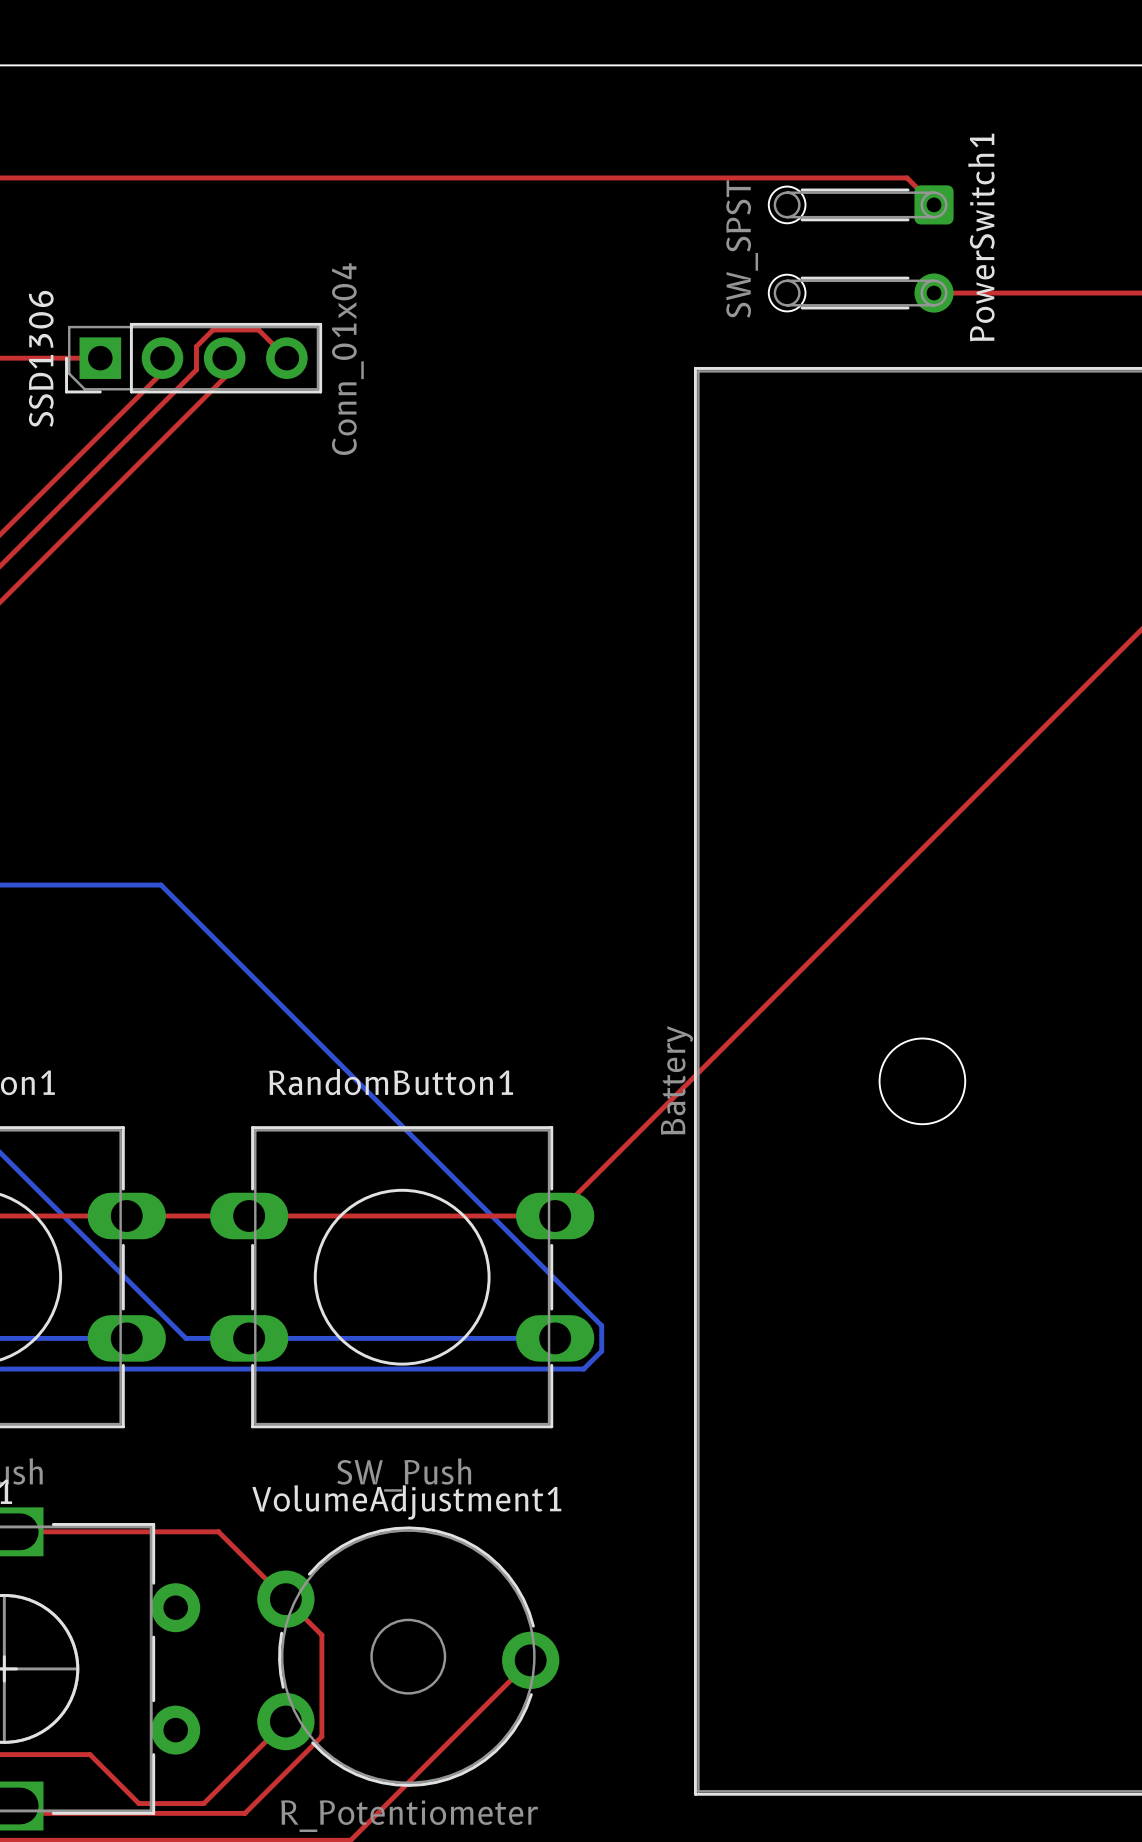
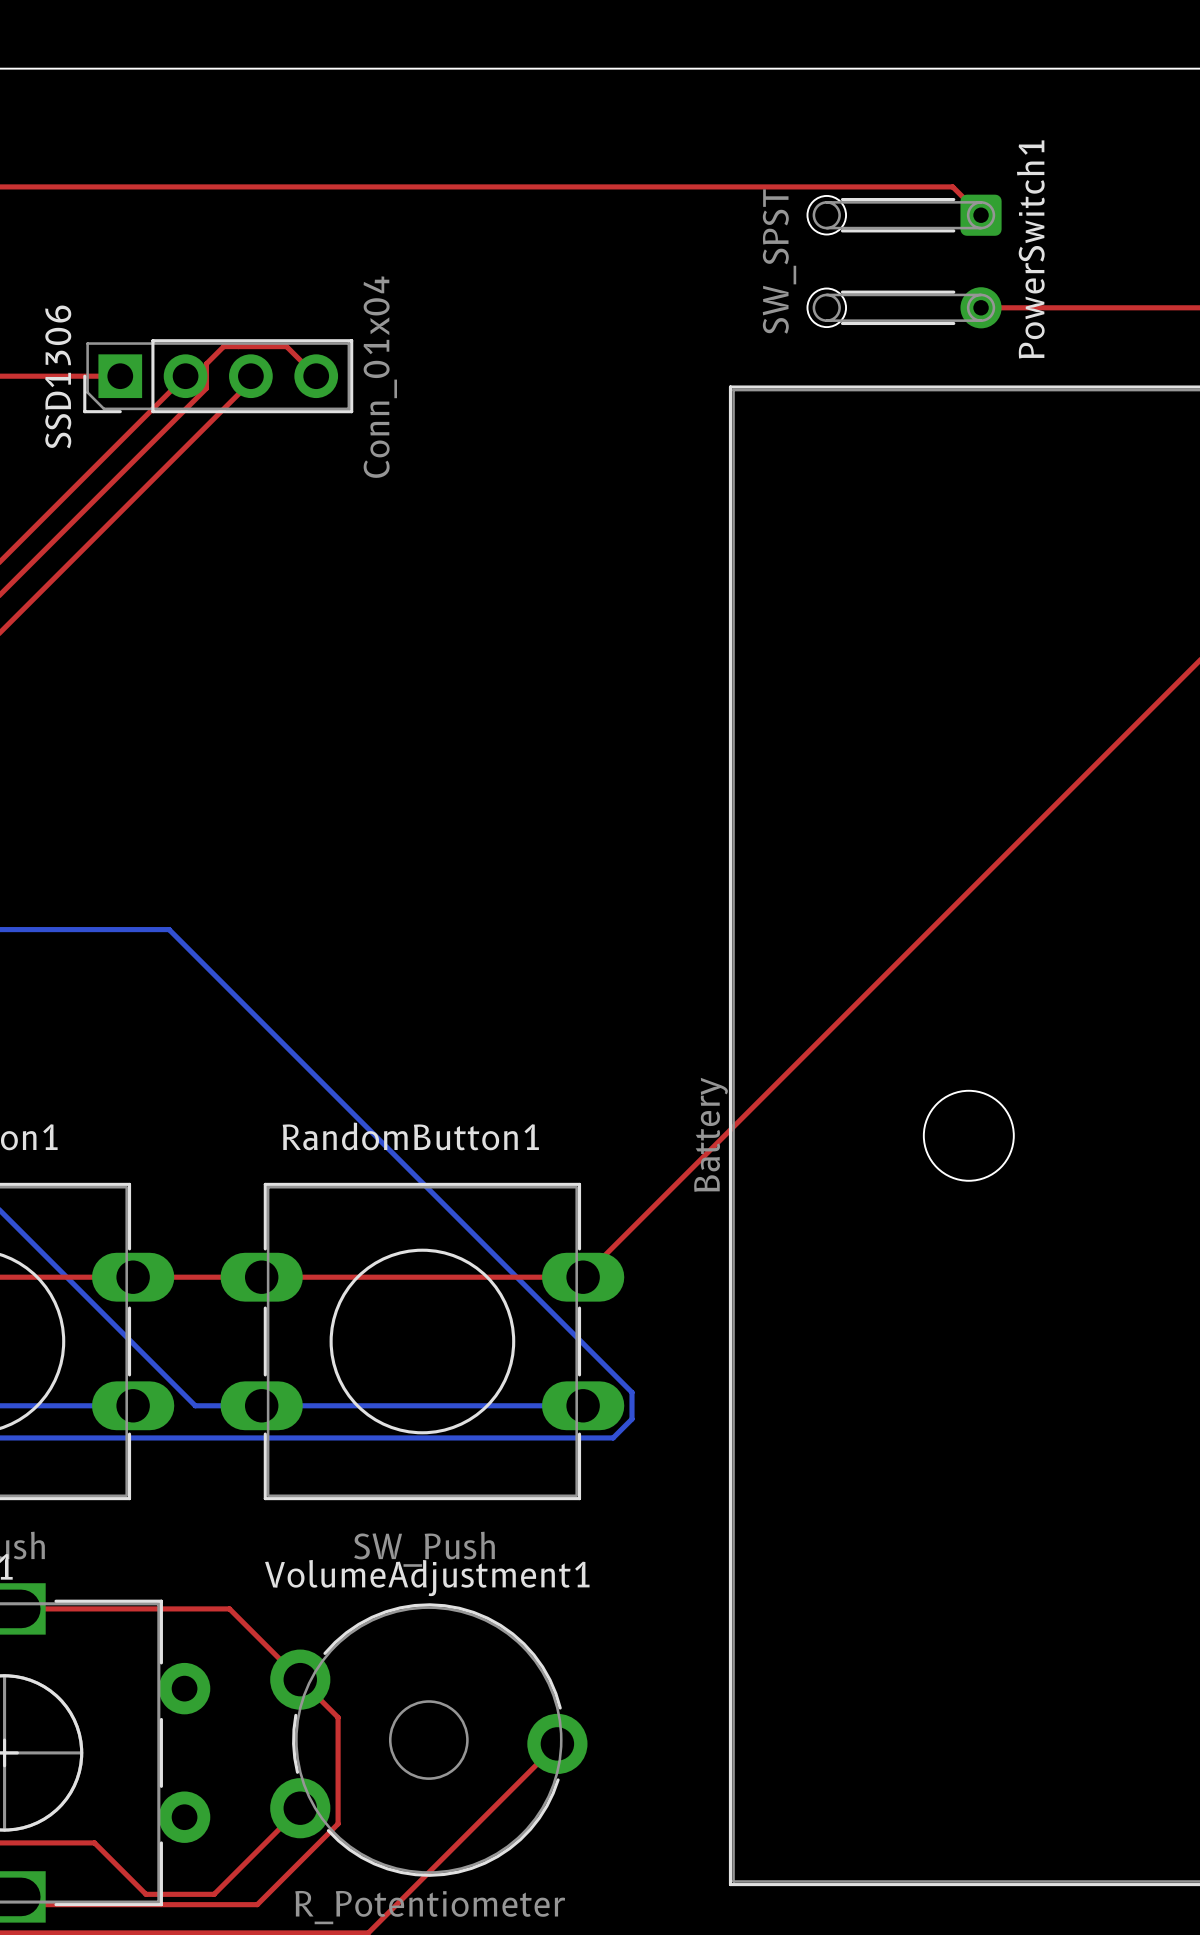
top track: (258, 329) (286, 358) -> (271, 346) (286, 346) (316, 376)
SSD1306 position: (193, 358) -> (218, 376)

